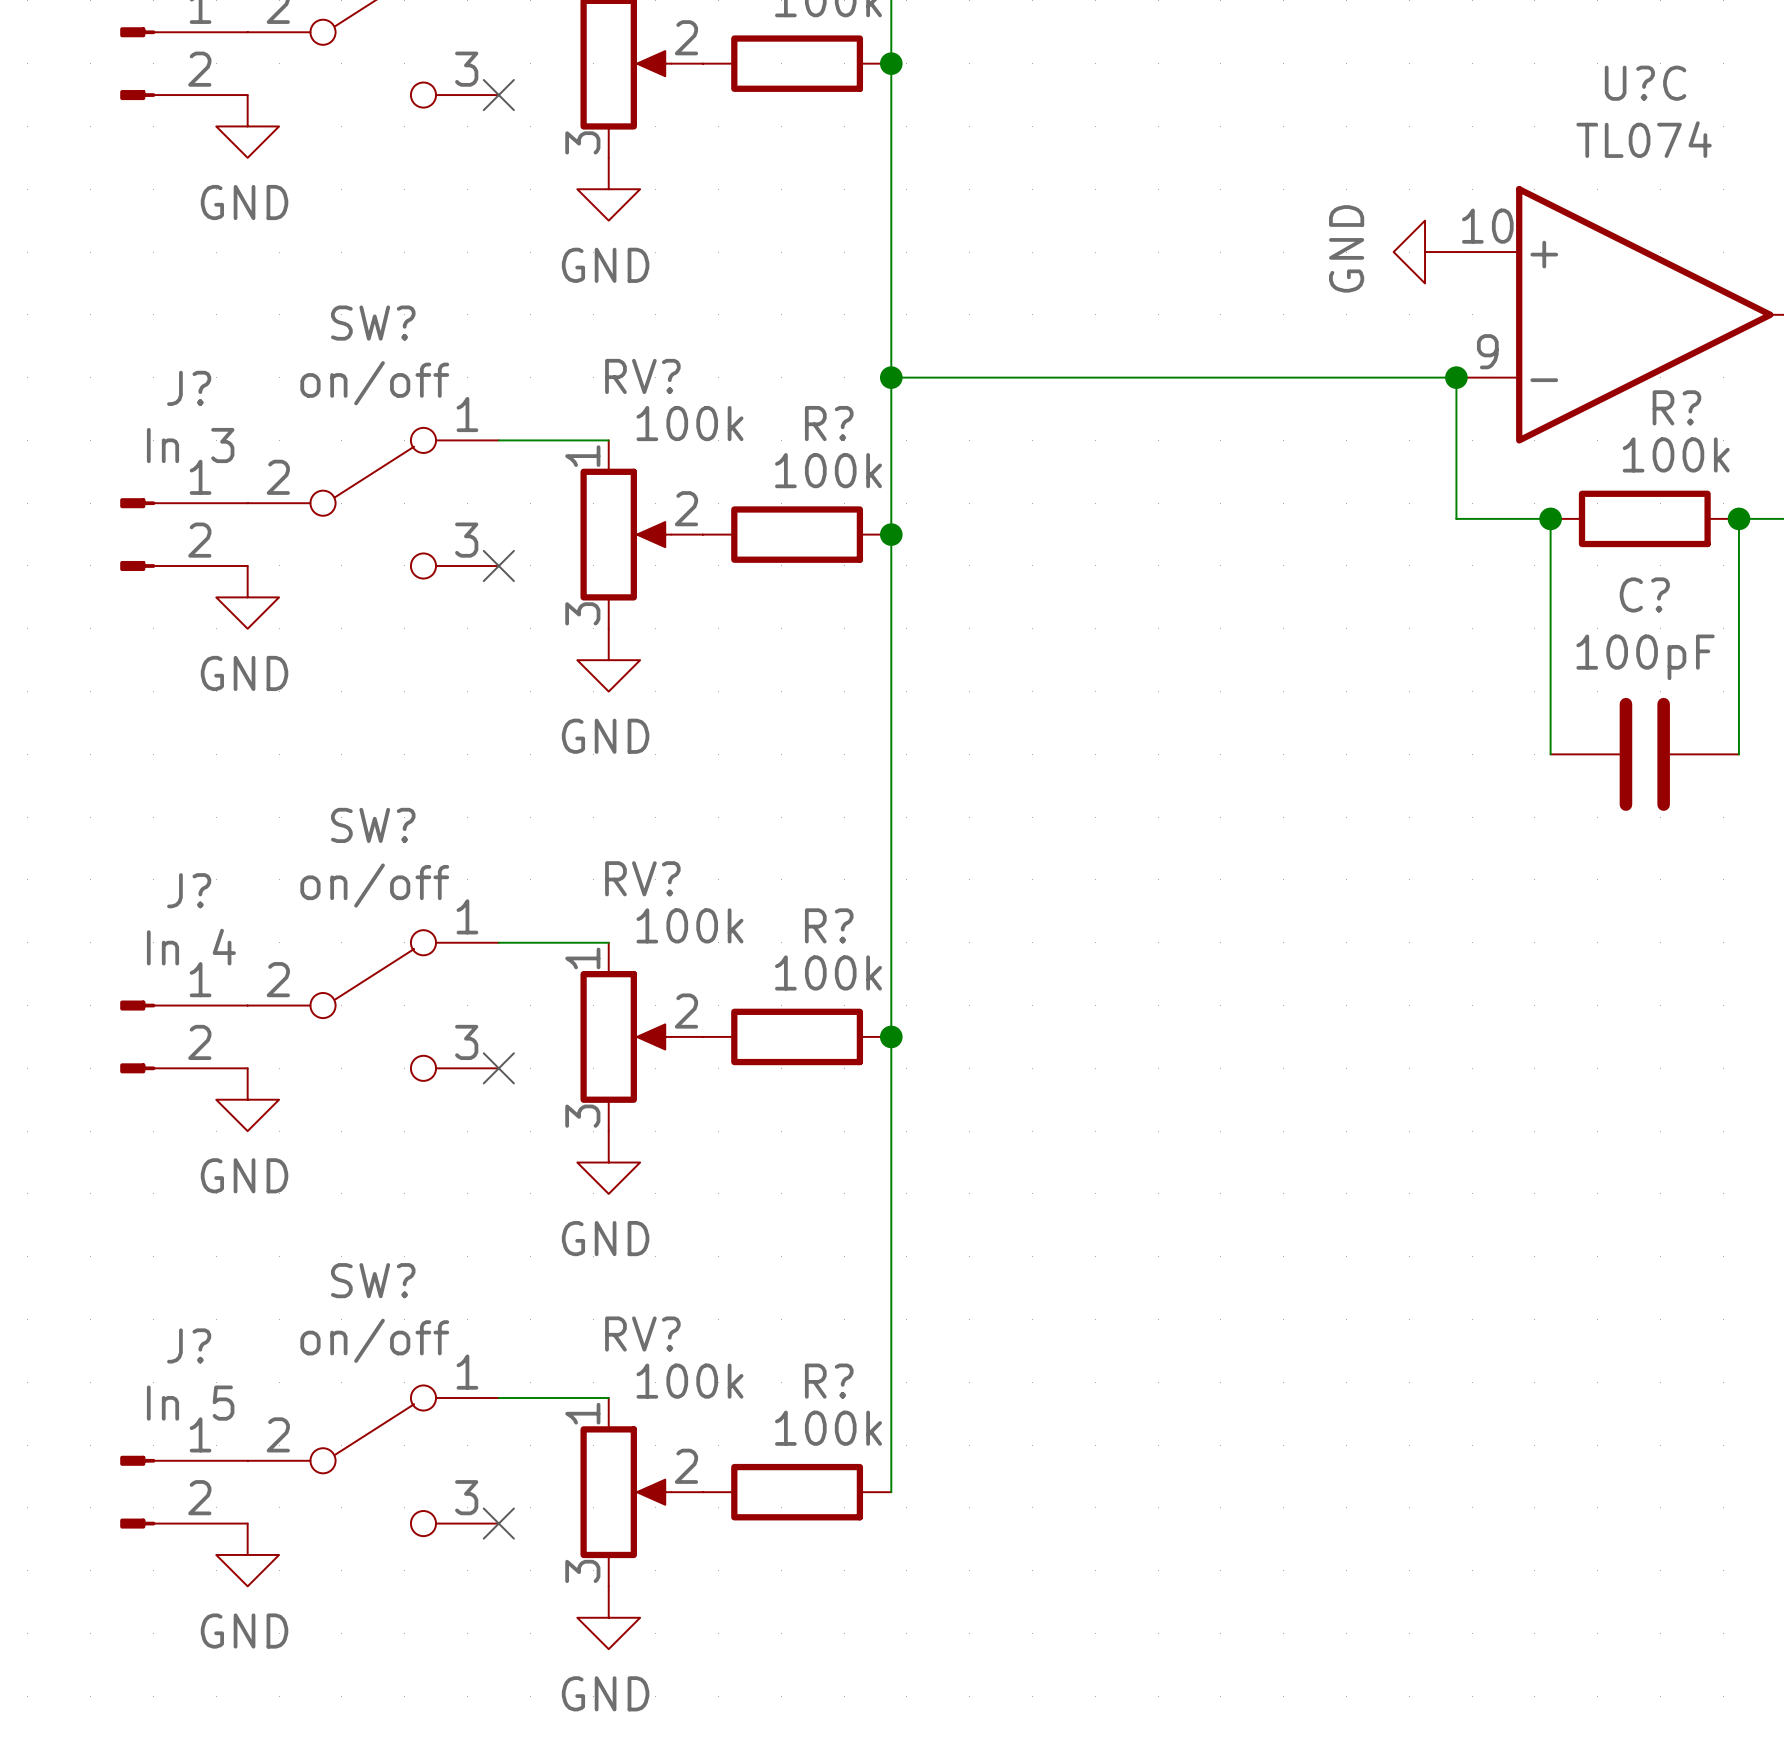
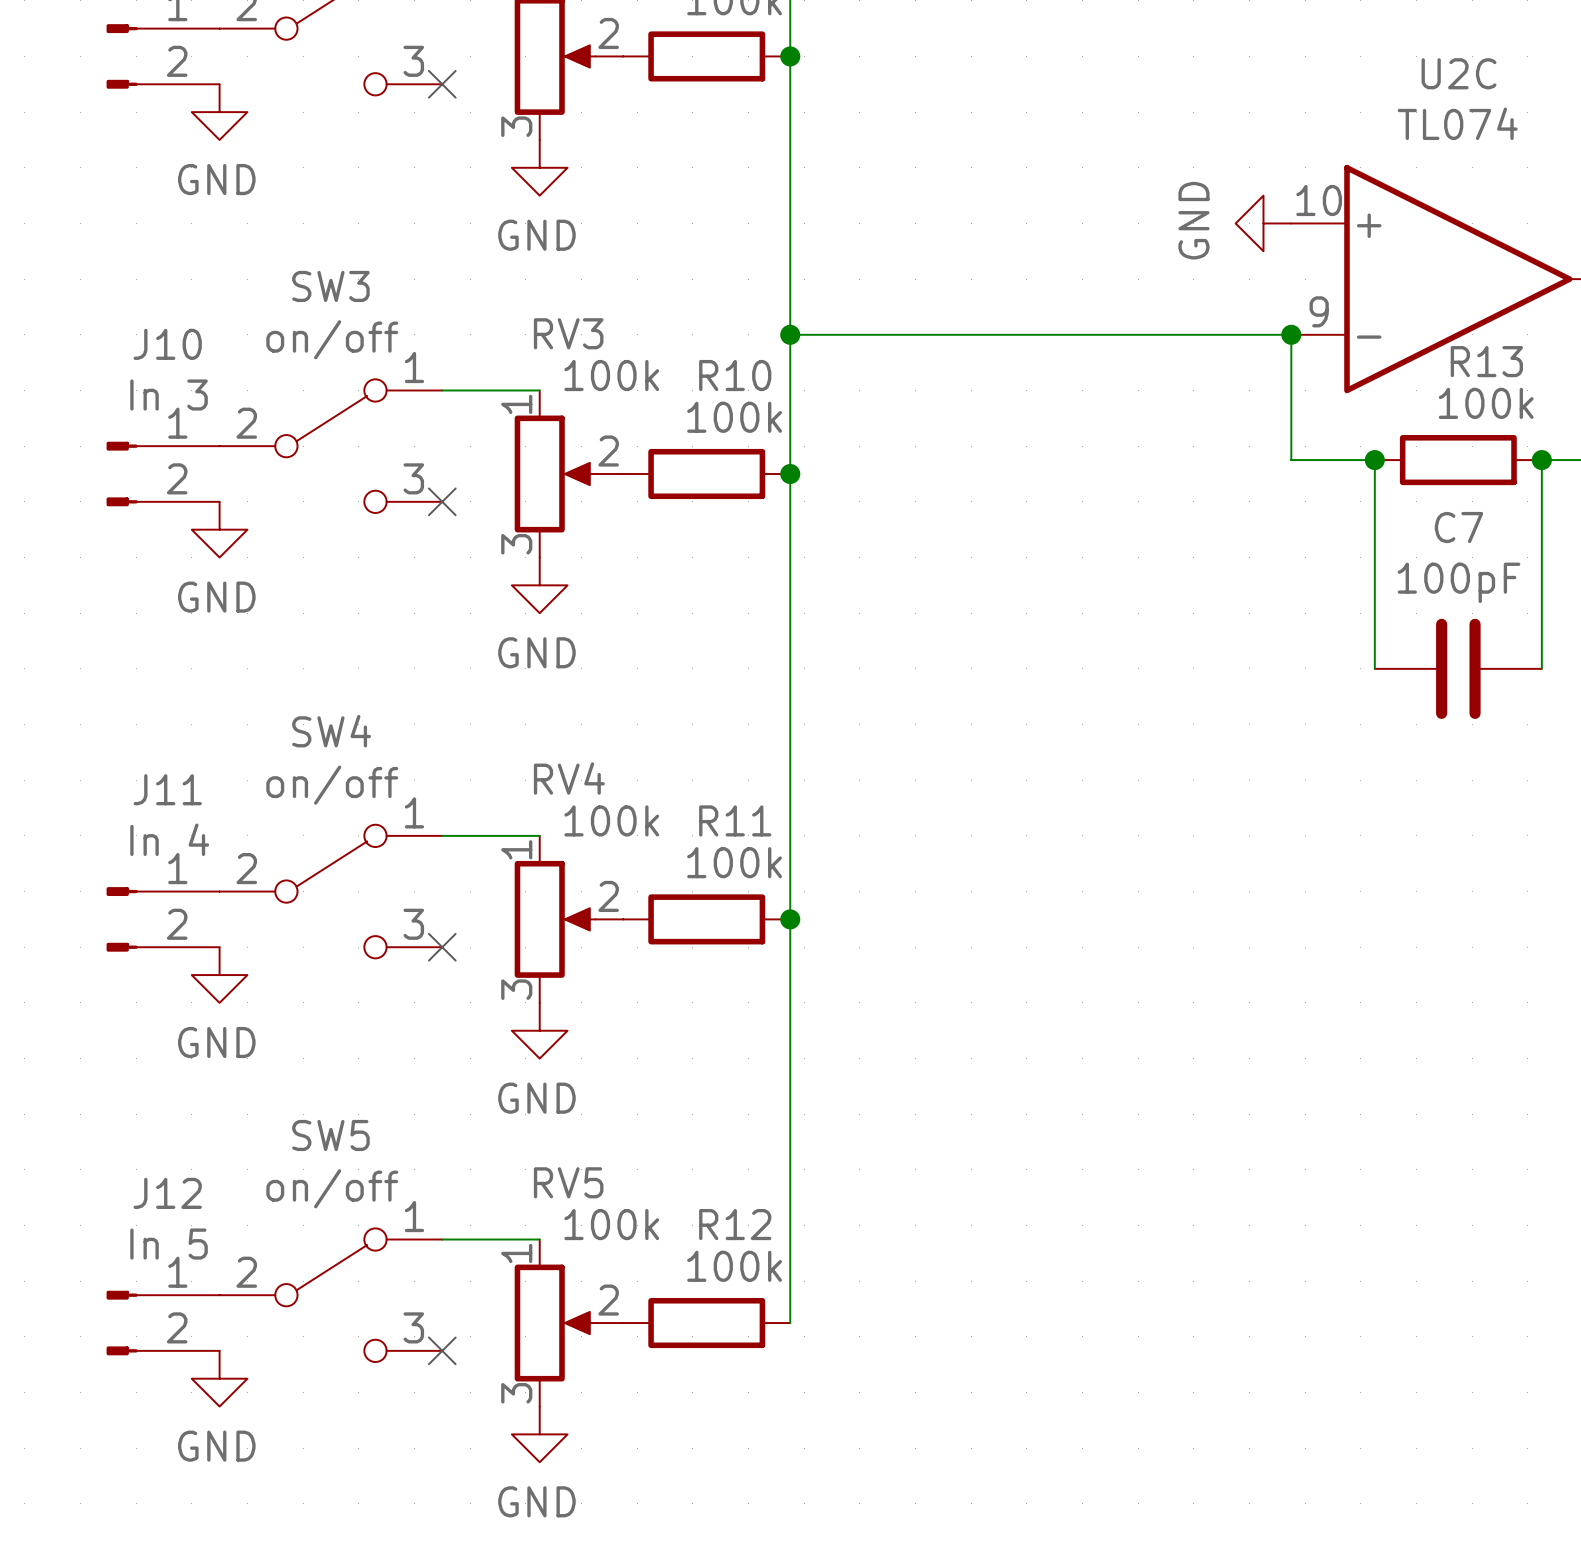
U?C name: U?C (1645, 83) -> U2C (1459, 73)
SW? name: SW? (373, 323) -> SW3 (330, 286)
RV? name: RV? (642, 376) -> RV3 (568, 333)
J? name: J? (189, 388) -> J10 (167, 344)
R? name: R? (1676, 407) -> R13 (1486, 361)
R? name: R? (829, 423) -> R10 (735, 375)
C? name: C? (1644, 594) -> C7 (1459, 527)
SW? name: SW? (373, 825) -> SW4 (331, 731)
RV? name: RV? (642, 878) -> RV4 (569, 778)
J? name: J? (189, 890) -> J11 (167, 789)
R? name: R? (829, 925) -> R11 (735, 820)
SW? name: SW? (373, 1280) -> SW5 (330, 1135)
RV? name: RV? (642, 1334) -> RV5 (568, 1182)
J? name: J? (189, 1345) -> J12 (167, 1193)
R? name: R? (829, 1381) -> R12 (735, 1224)

